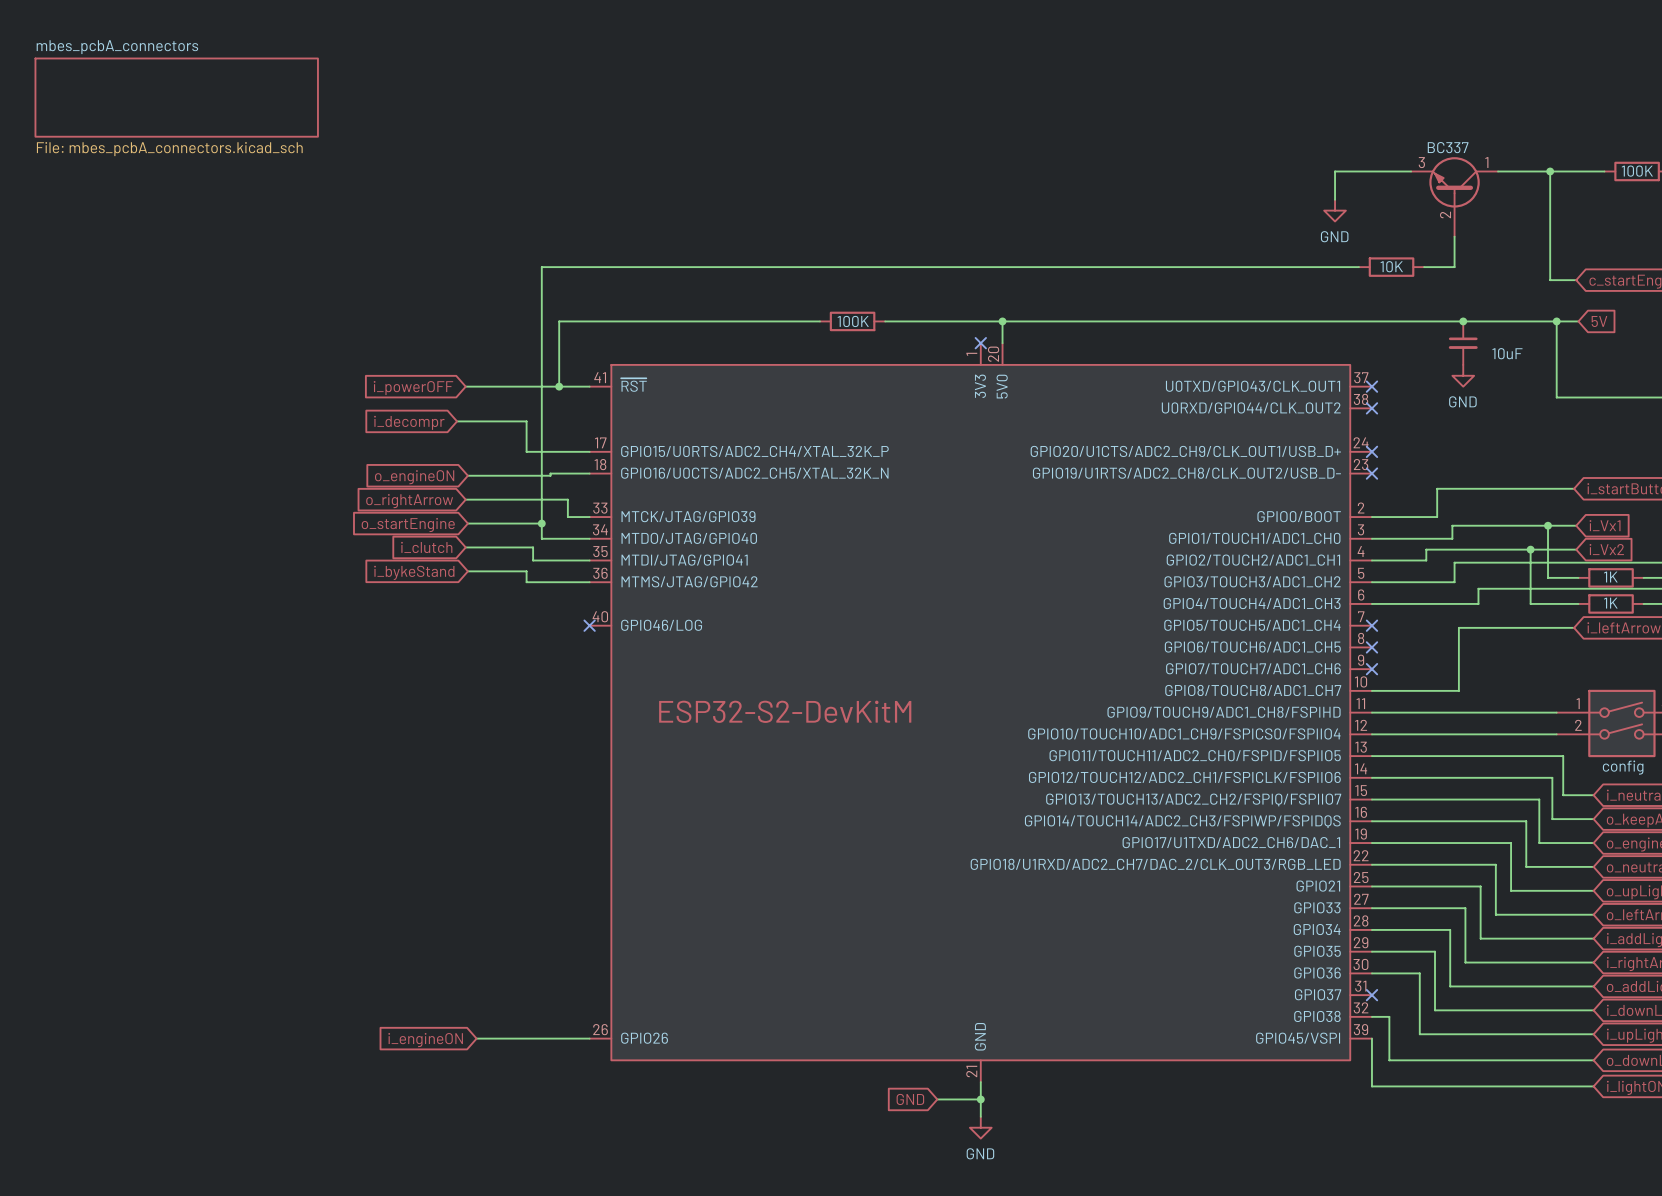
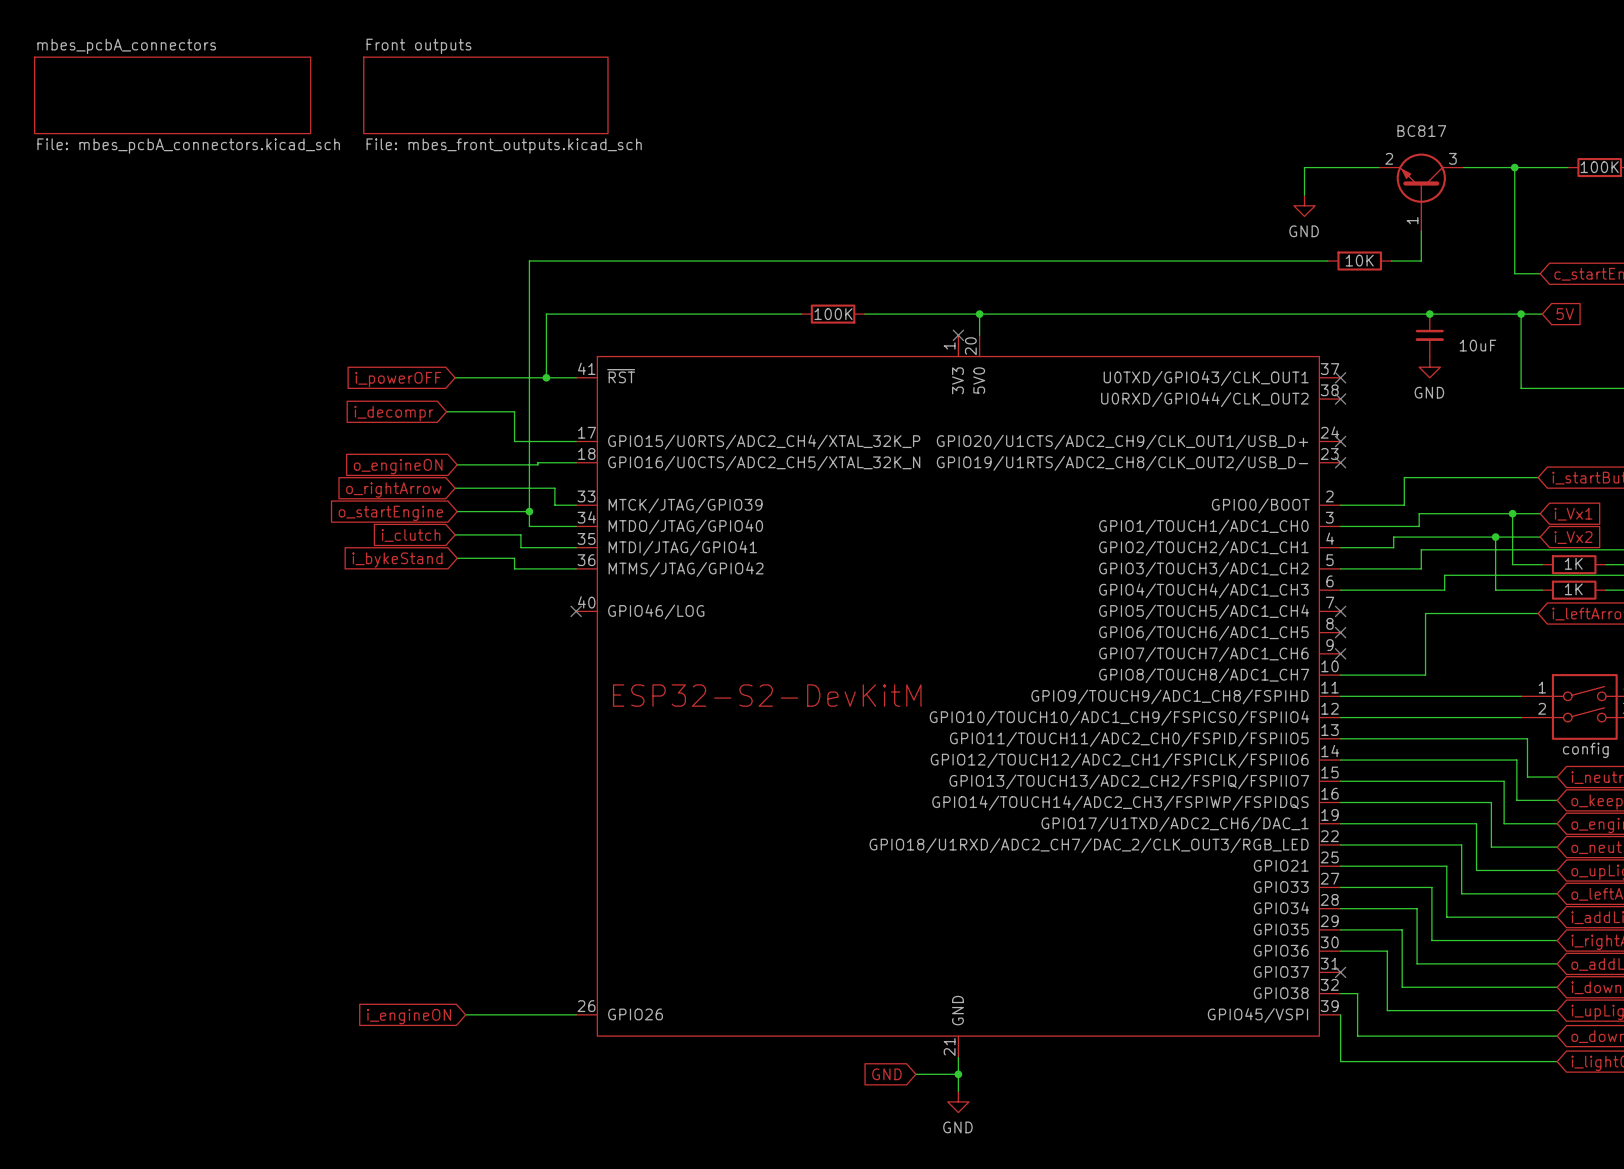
sheet Front outputs: none -> File: mbes_front_outputs.kicad_sch (485, 95)
part value: BC337 (1448, 147) -> BC817 (1421, 131)
part symbol: [1411, 157, 1499, 237] -> [1378, 153, 1464, 232]

